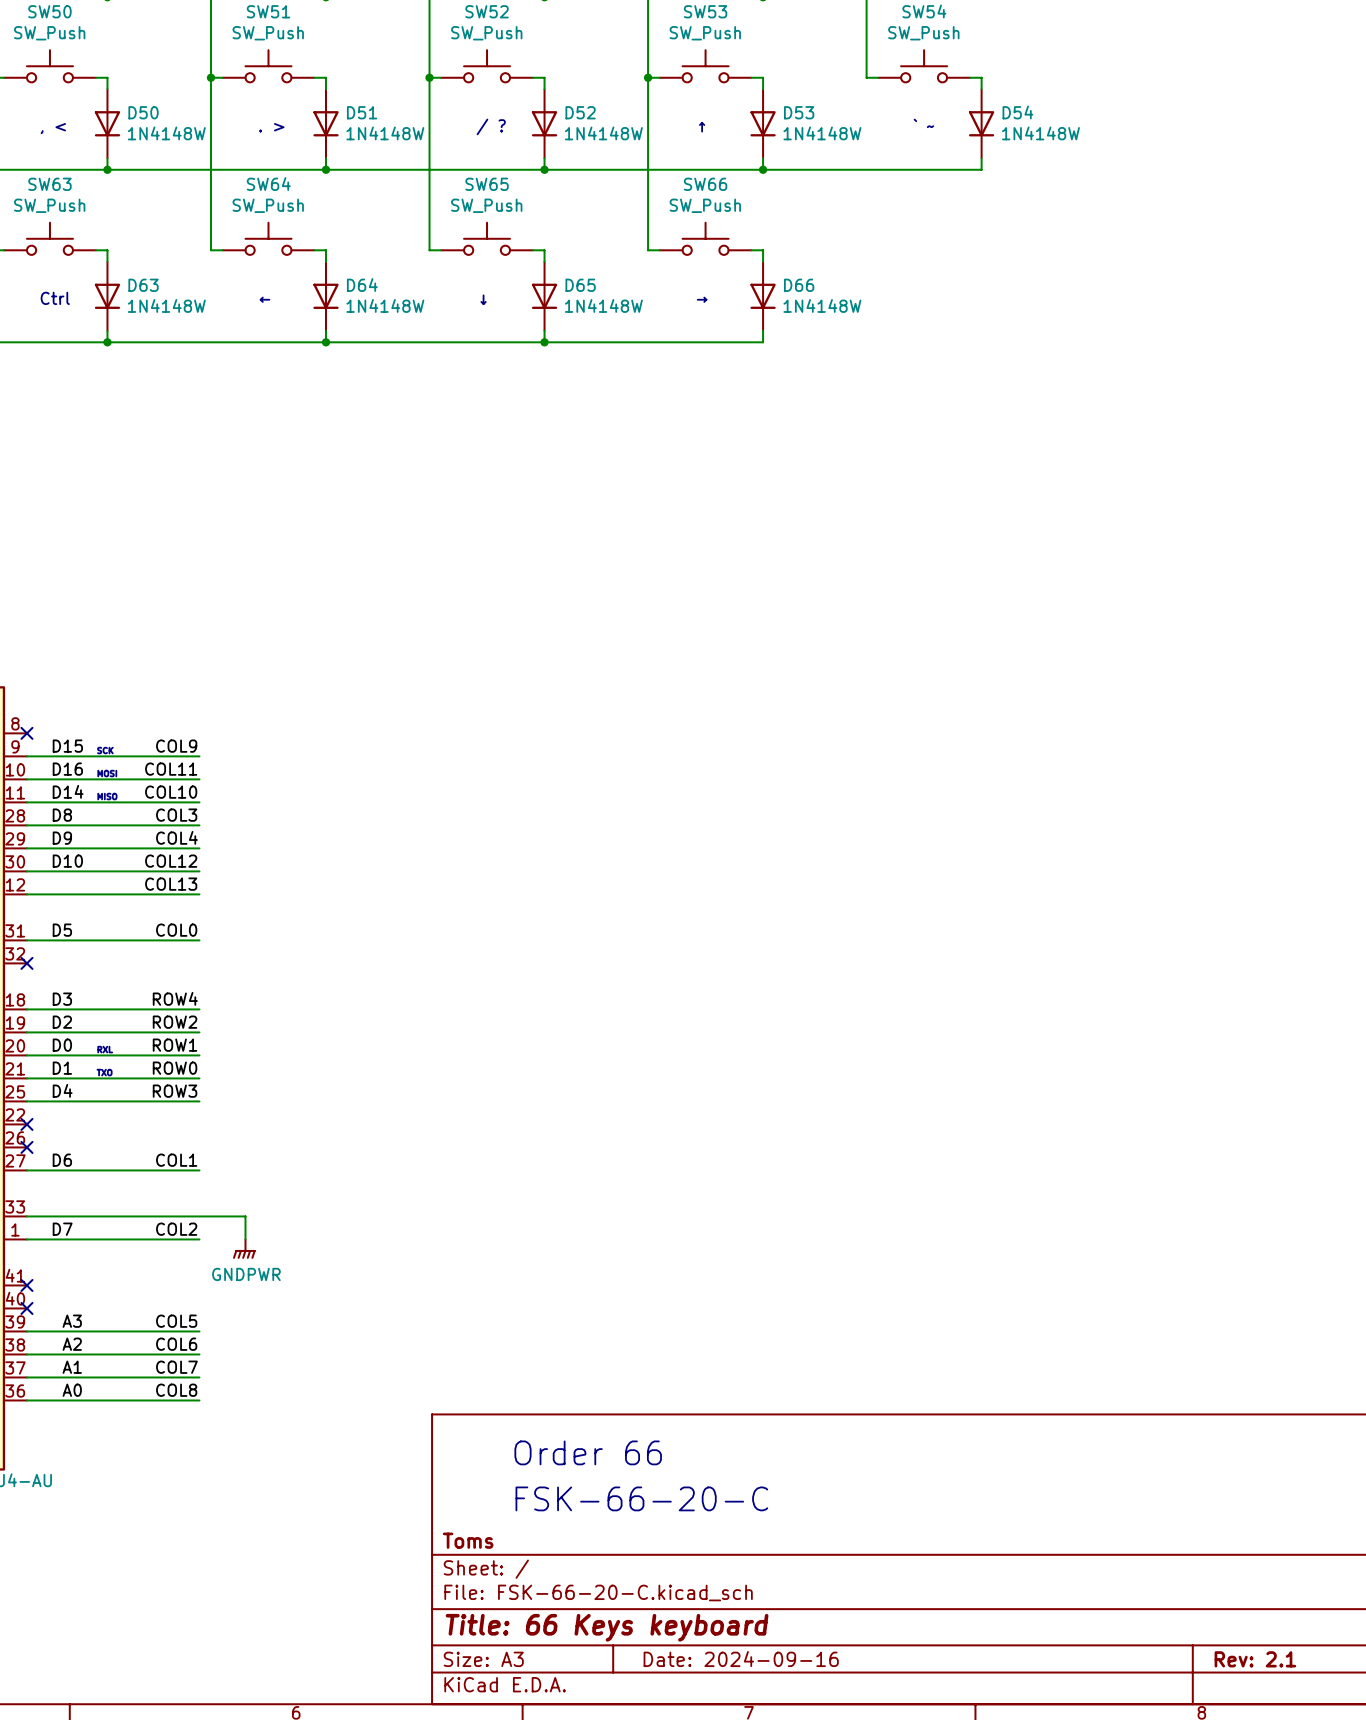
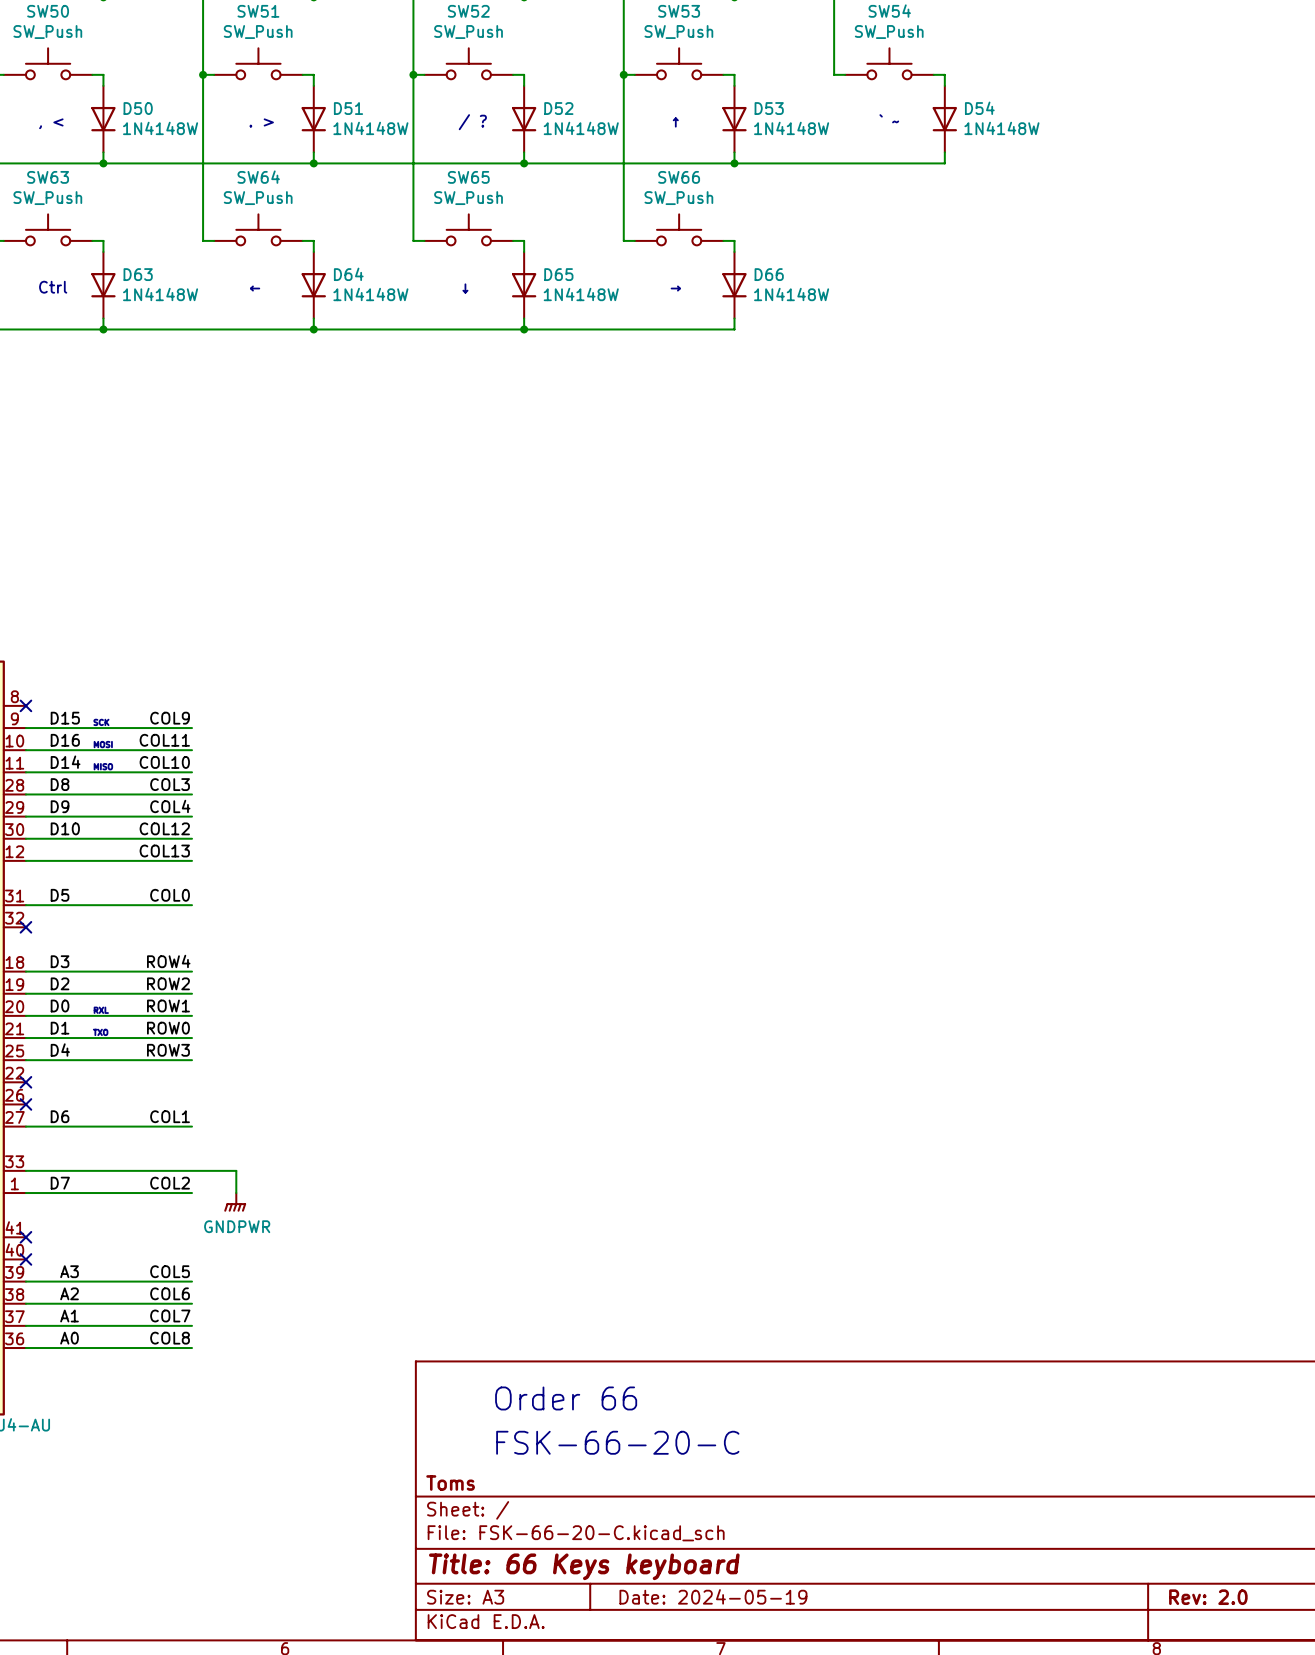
title block: Date: 2024-09-16 (741, 1659) -> Date: 2024-05-19 (713, 1596)
title block: Rev: 2.1 (1255, 1659) -> Rev: 2.0 (1208, 1597)

